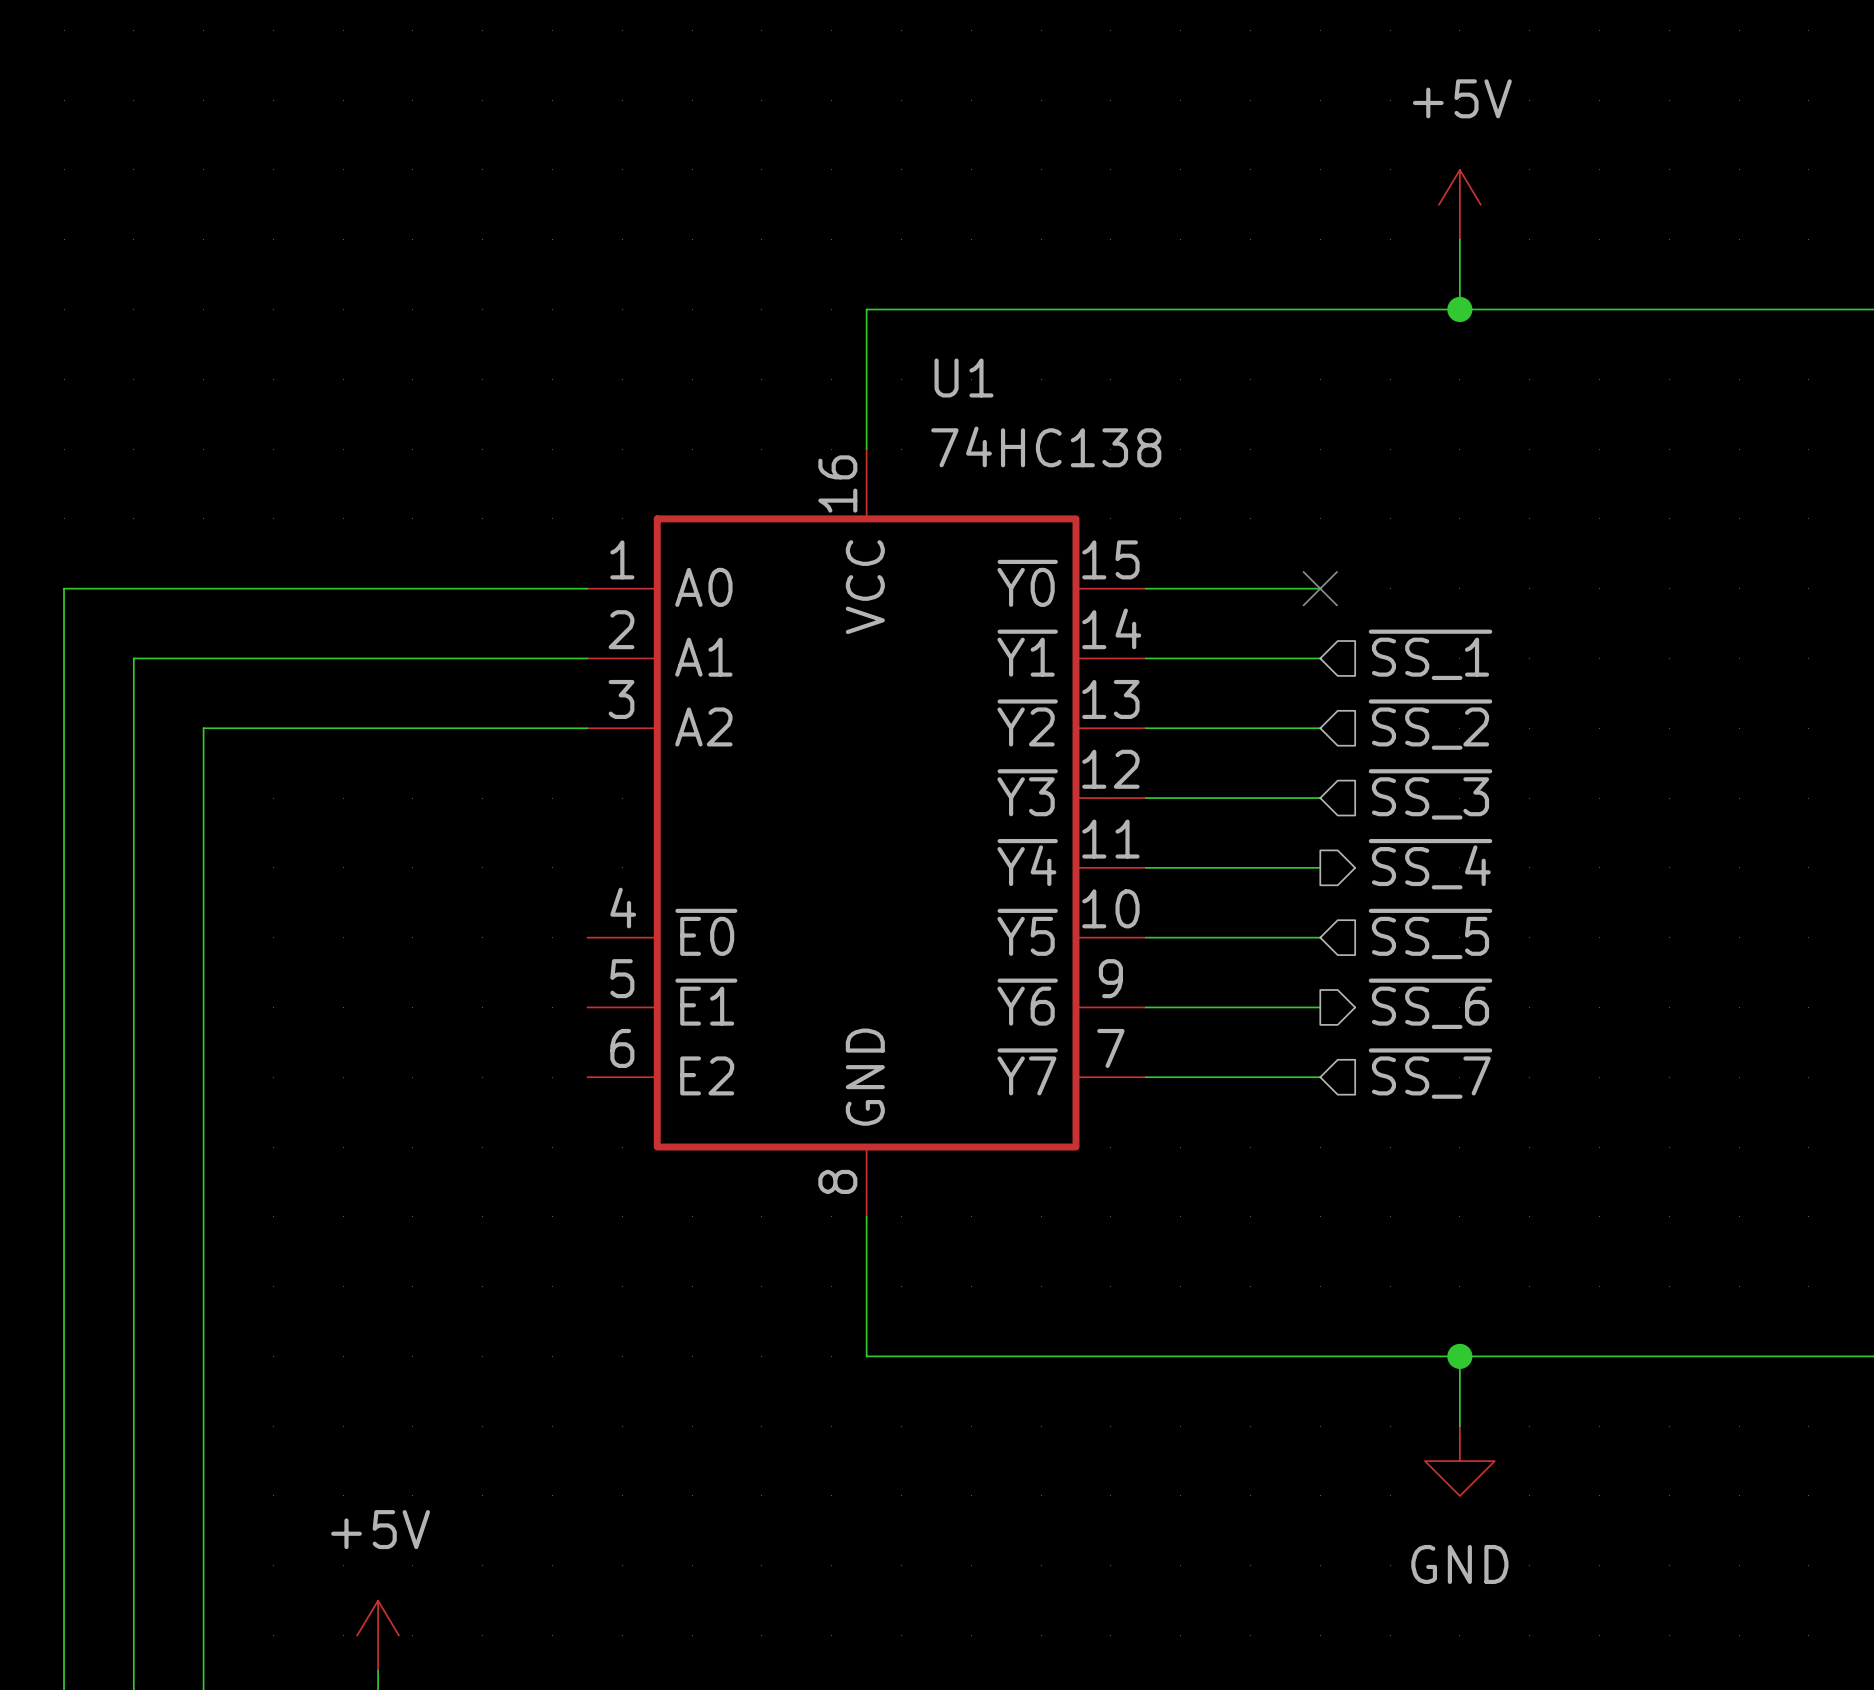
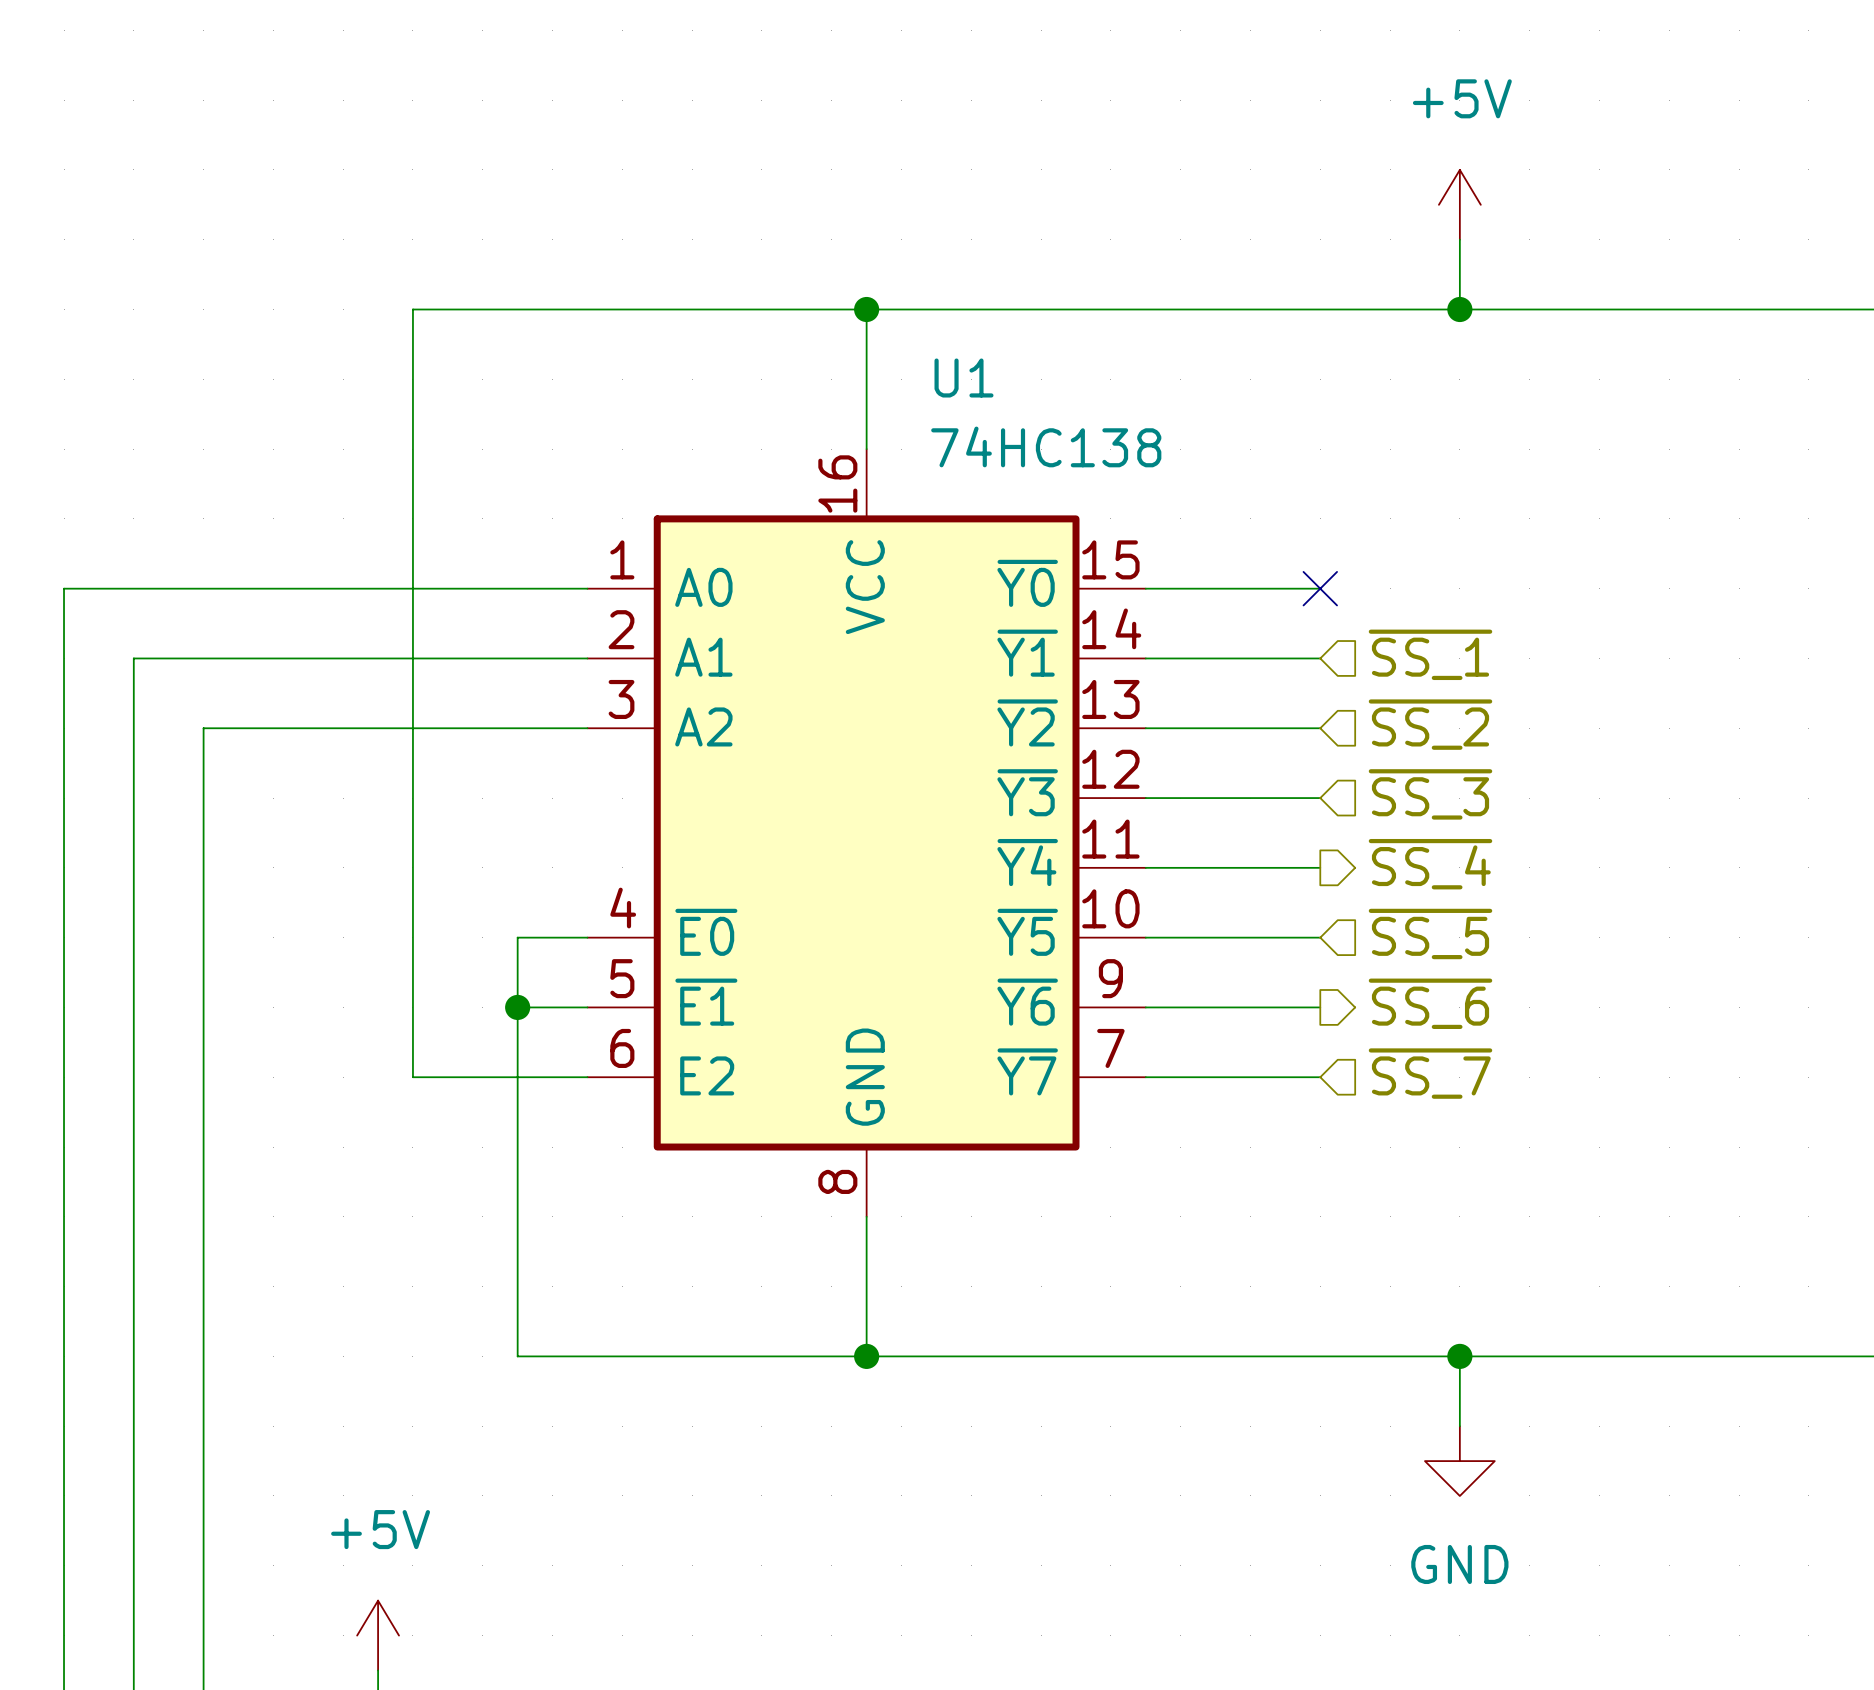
wire: none -> (866, 309) (412, 309) (412, 1077) (587, 1077)
junction: none -> (866, 309)
wire: none -> (587, 937) (517, 937) (517, 1356) (866, 1356)
wire: none -> (517, 1007) (587, 1007)
junction: none -> (517, 1007)
junction: none -> (866, 1356)

